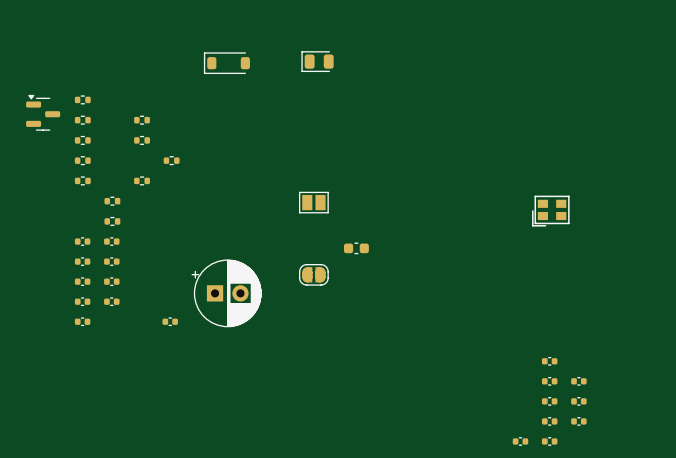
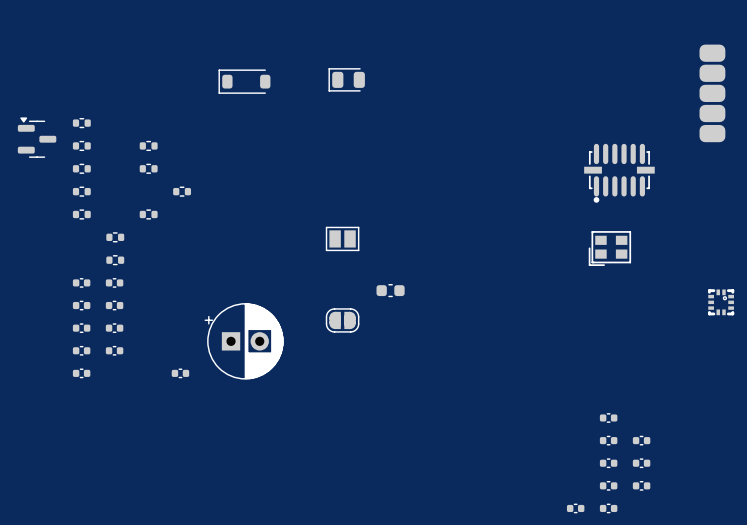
part: none -> (712, 93)
part: none -> (619, 173)
part: none -> (721, 302)

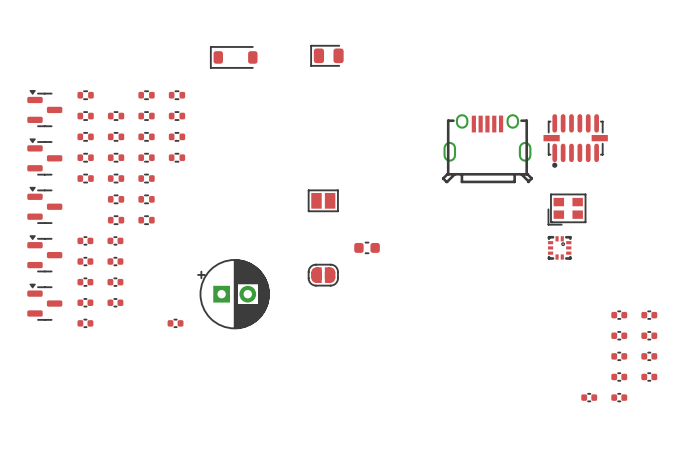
part: (712, 93) -> none
part: none -> (146, 95)
part: none -> (176, 95)
part: none -> (116, 116)
part: none -> (176, 116)
part: none -> (116, 136)
part: none -> (176, 136)
part: none -> (487, 148)
part: none -> (44, 156)
part: none -> (116, 157)
part: none -> (146, 157)
part: none -> (116, 178)
part: none -> (146, 199)
part: none -> (44, 205)
part: none -> (146, 220)
part: none -> (44, 253)
part position: (721, 302) -> (559, 247)
part: none -> (44, 302)
part: none -> (619, 315)
part: none -> (649, 315)
part: none -> (619, 335)
part: none -> (649, 335)
part: none -> (619, 356)
part: none -> (649, 356)
part: (608, 417) -> none
part: none -> (619, 376)
part: none -> (649, 376)
part: (608, 440) -> none
part: (641, 440) -> none
part: none -> (589, 397)
part: none -> (619, 397)
part: (608, 463) -> none
part: (641, 463) -> none
part: (608, 485) -> none
part: (641, 485) -> none
part: (575, 508) -> none
part: (608, 508) -> none

